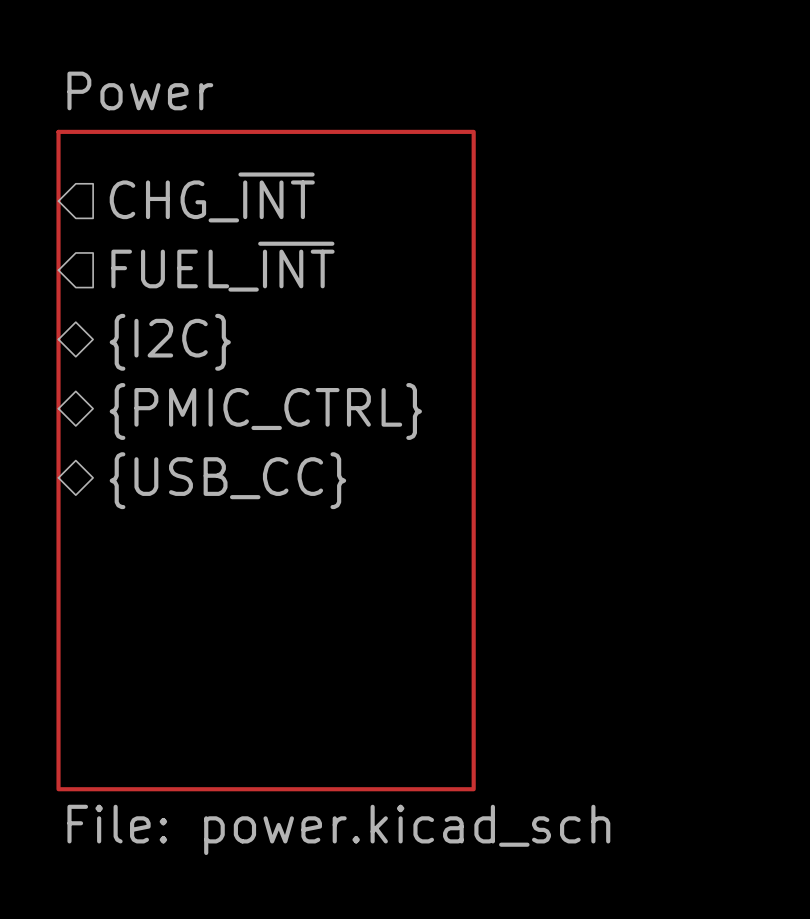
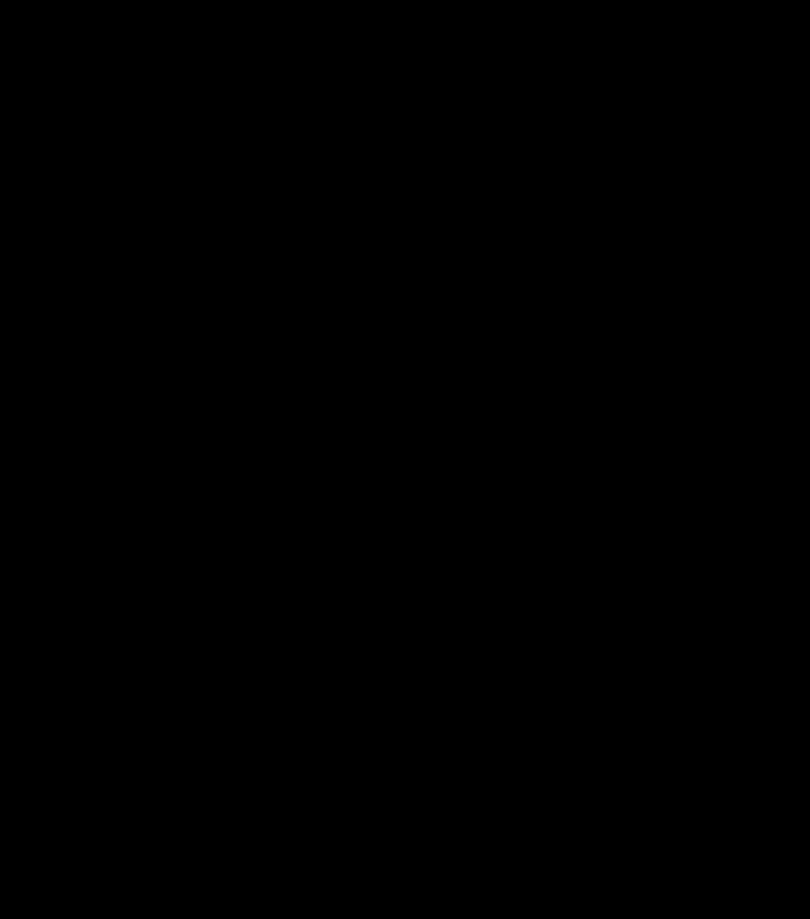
sheet pin: CHG_~{INT} (212, 197) -> none
sheet pin: FUEL_~{INT} (222, 266) -> none
sheet pin: {I2C} (170, 342) -> none
sheet pin: {PMIC_CTRL} (265, 411) -> none
sheet Power: File: power.kicad_sch (266, 460) -> none
sheet pin: {USB_CC} (227, 480) -> none

